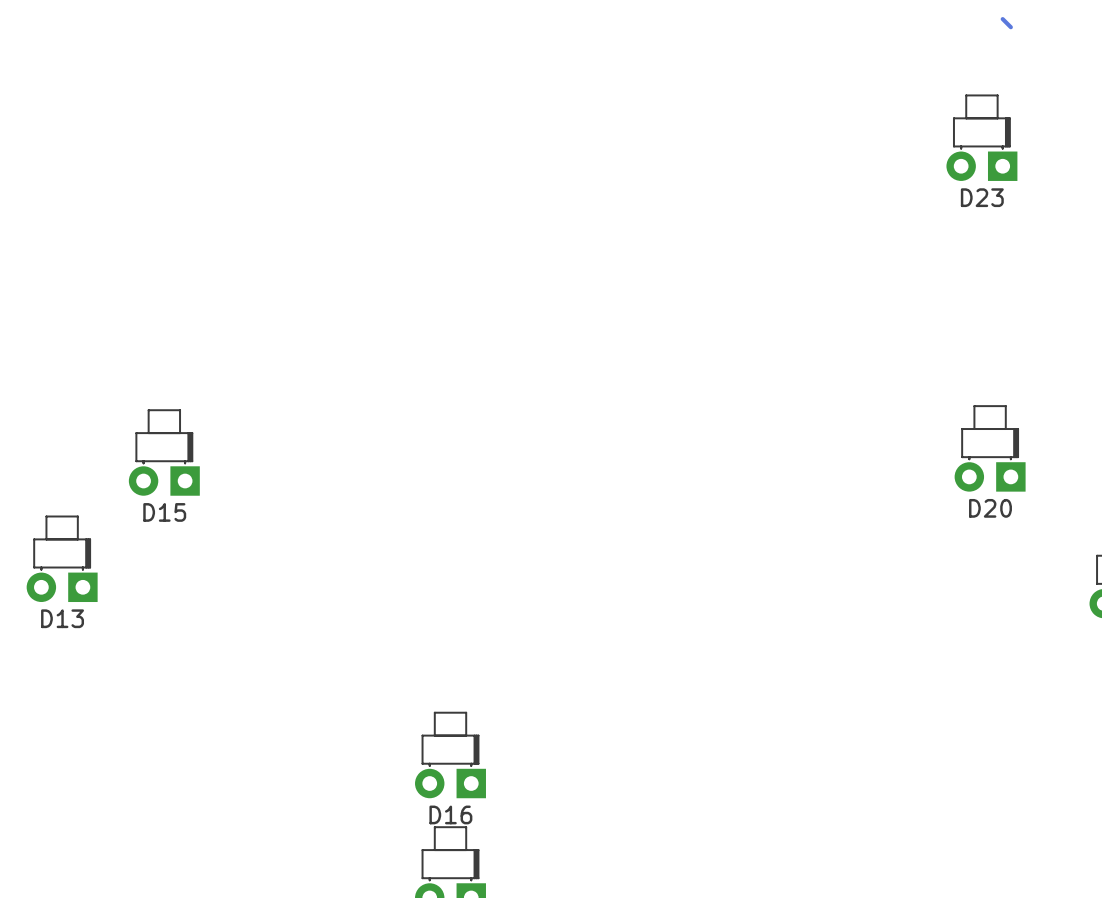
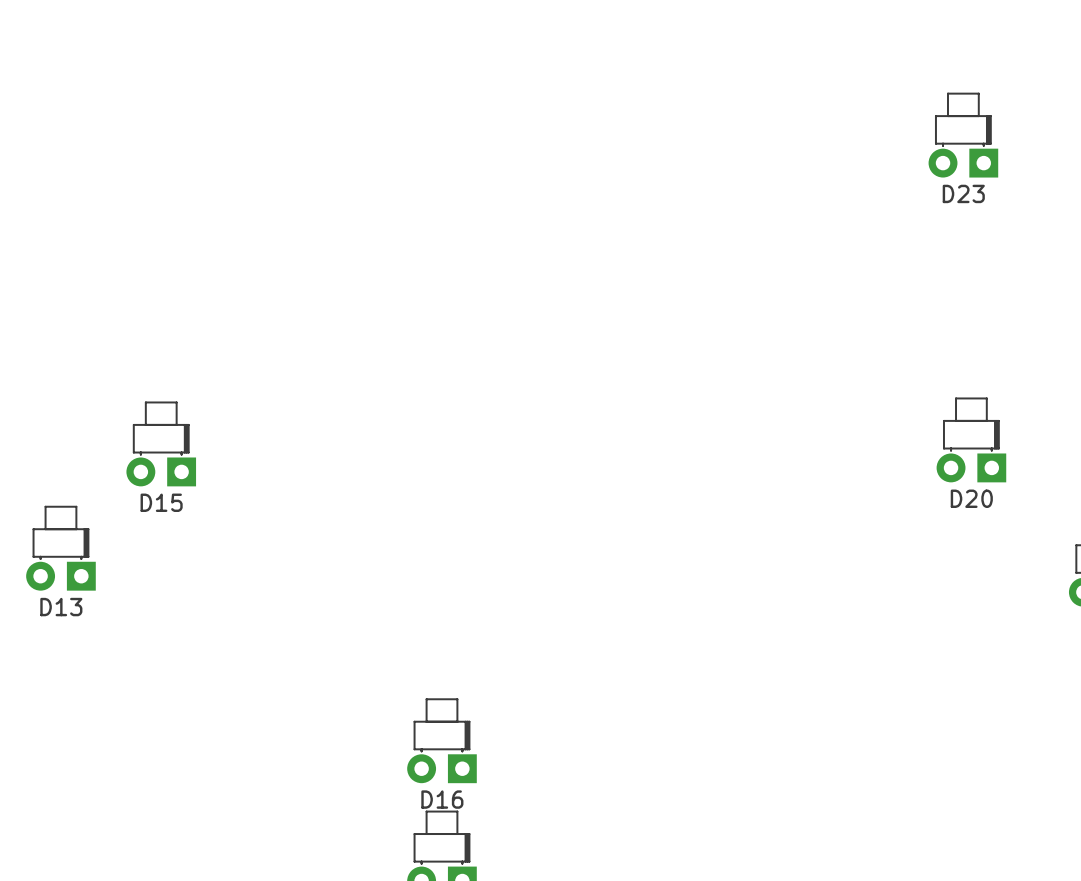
track: (1002, 19) (1010, 27) -> none

